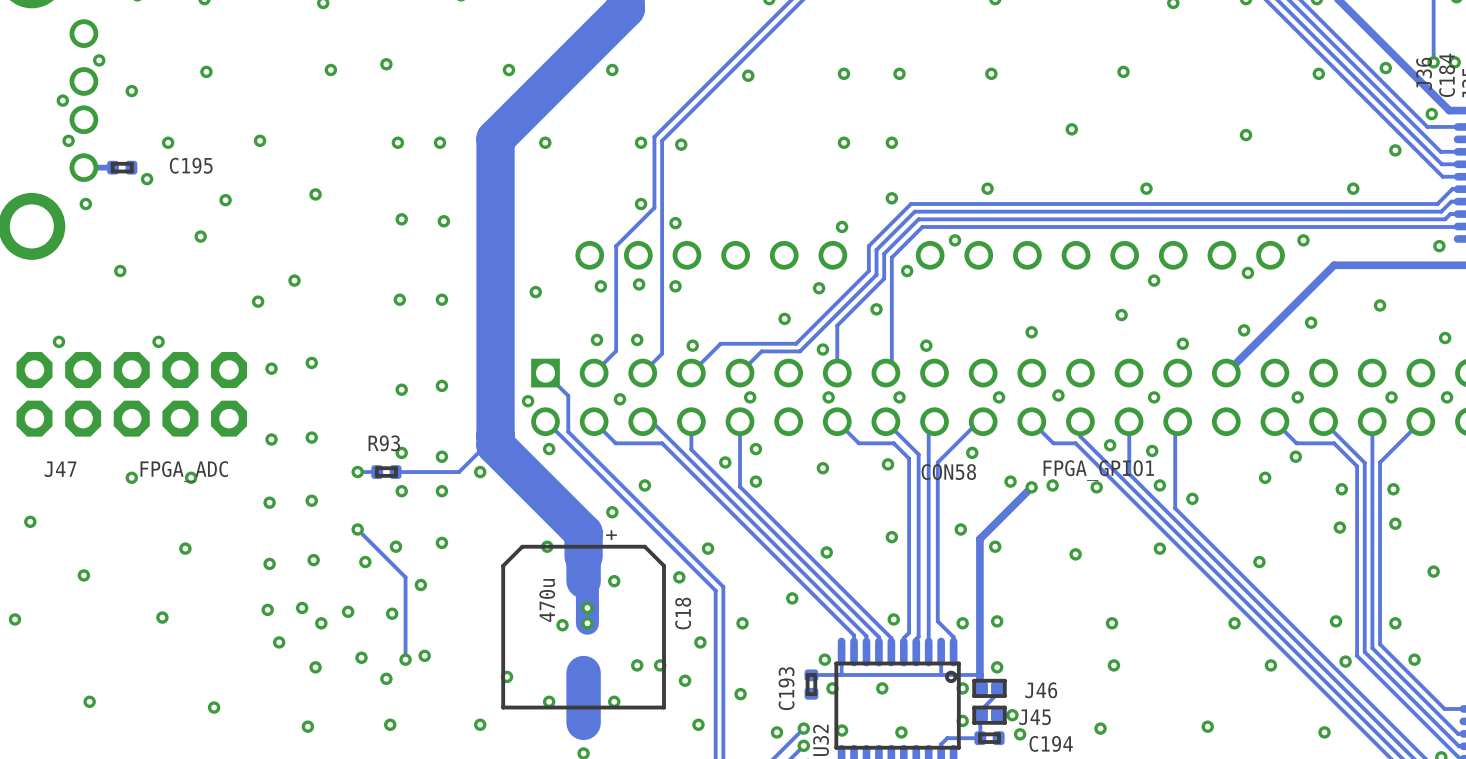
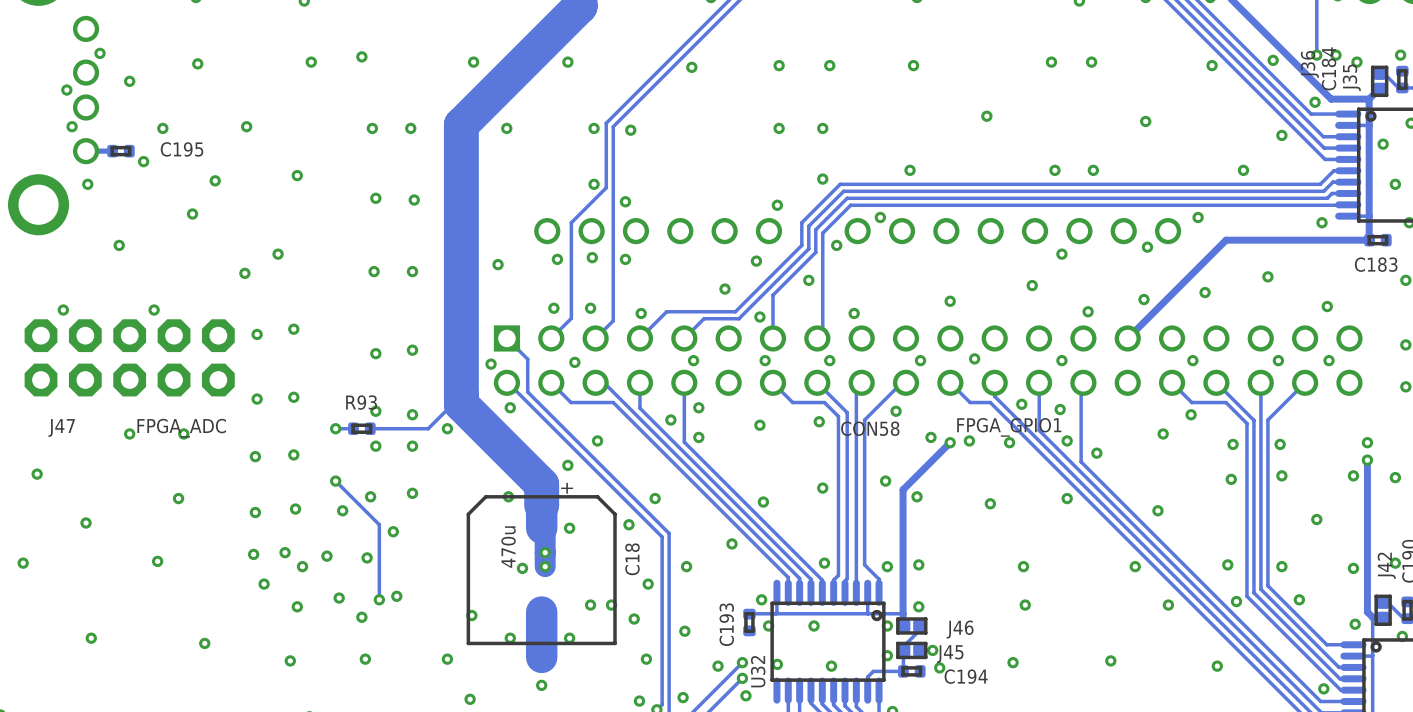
via: none -> (1091, 62)
via position: (1123, 71) -> (1051, 62)
via: none -> (1093, 170)

